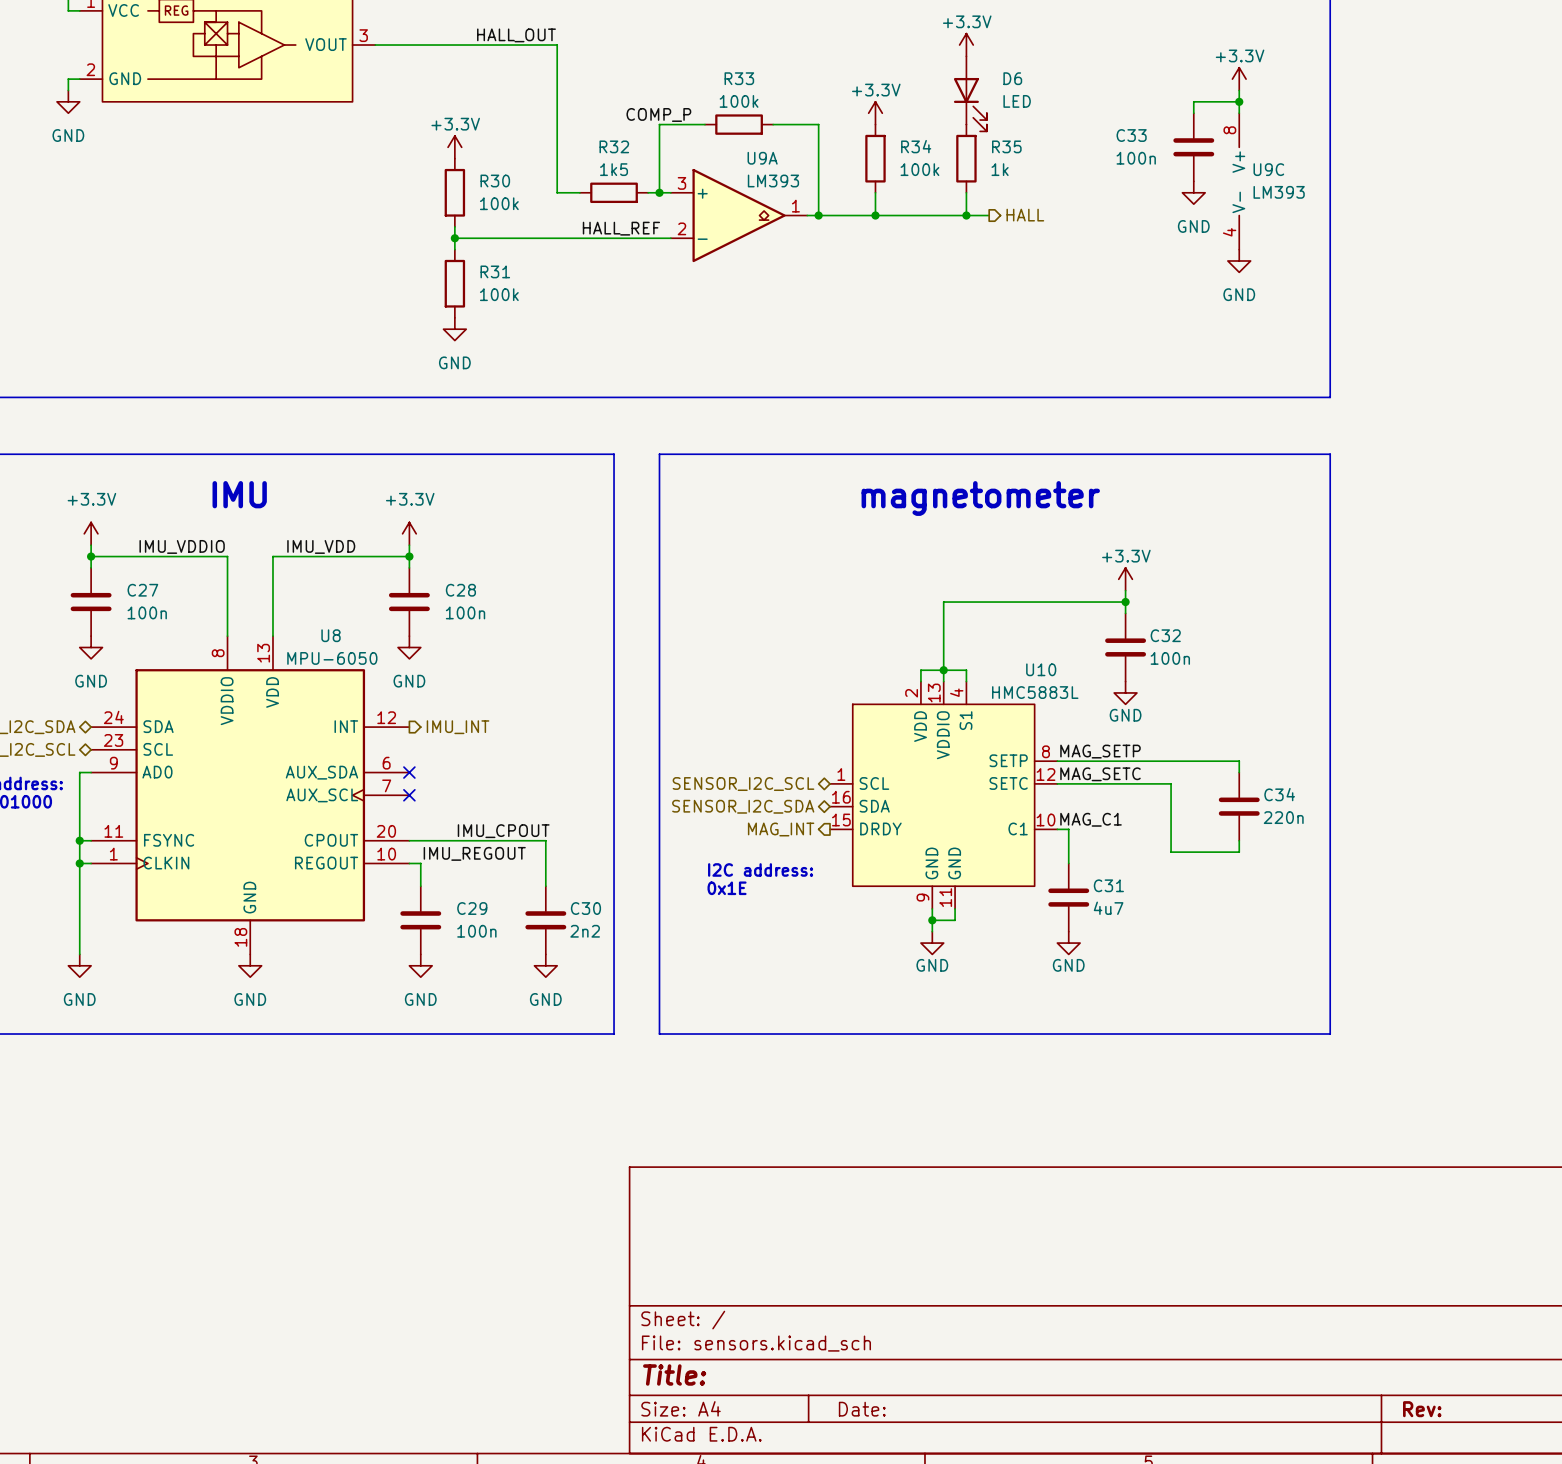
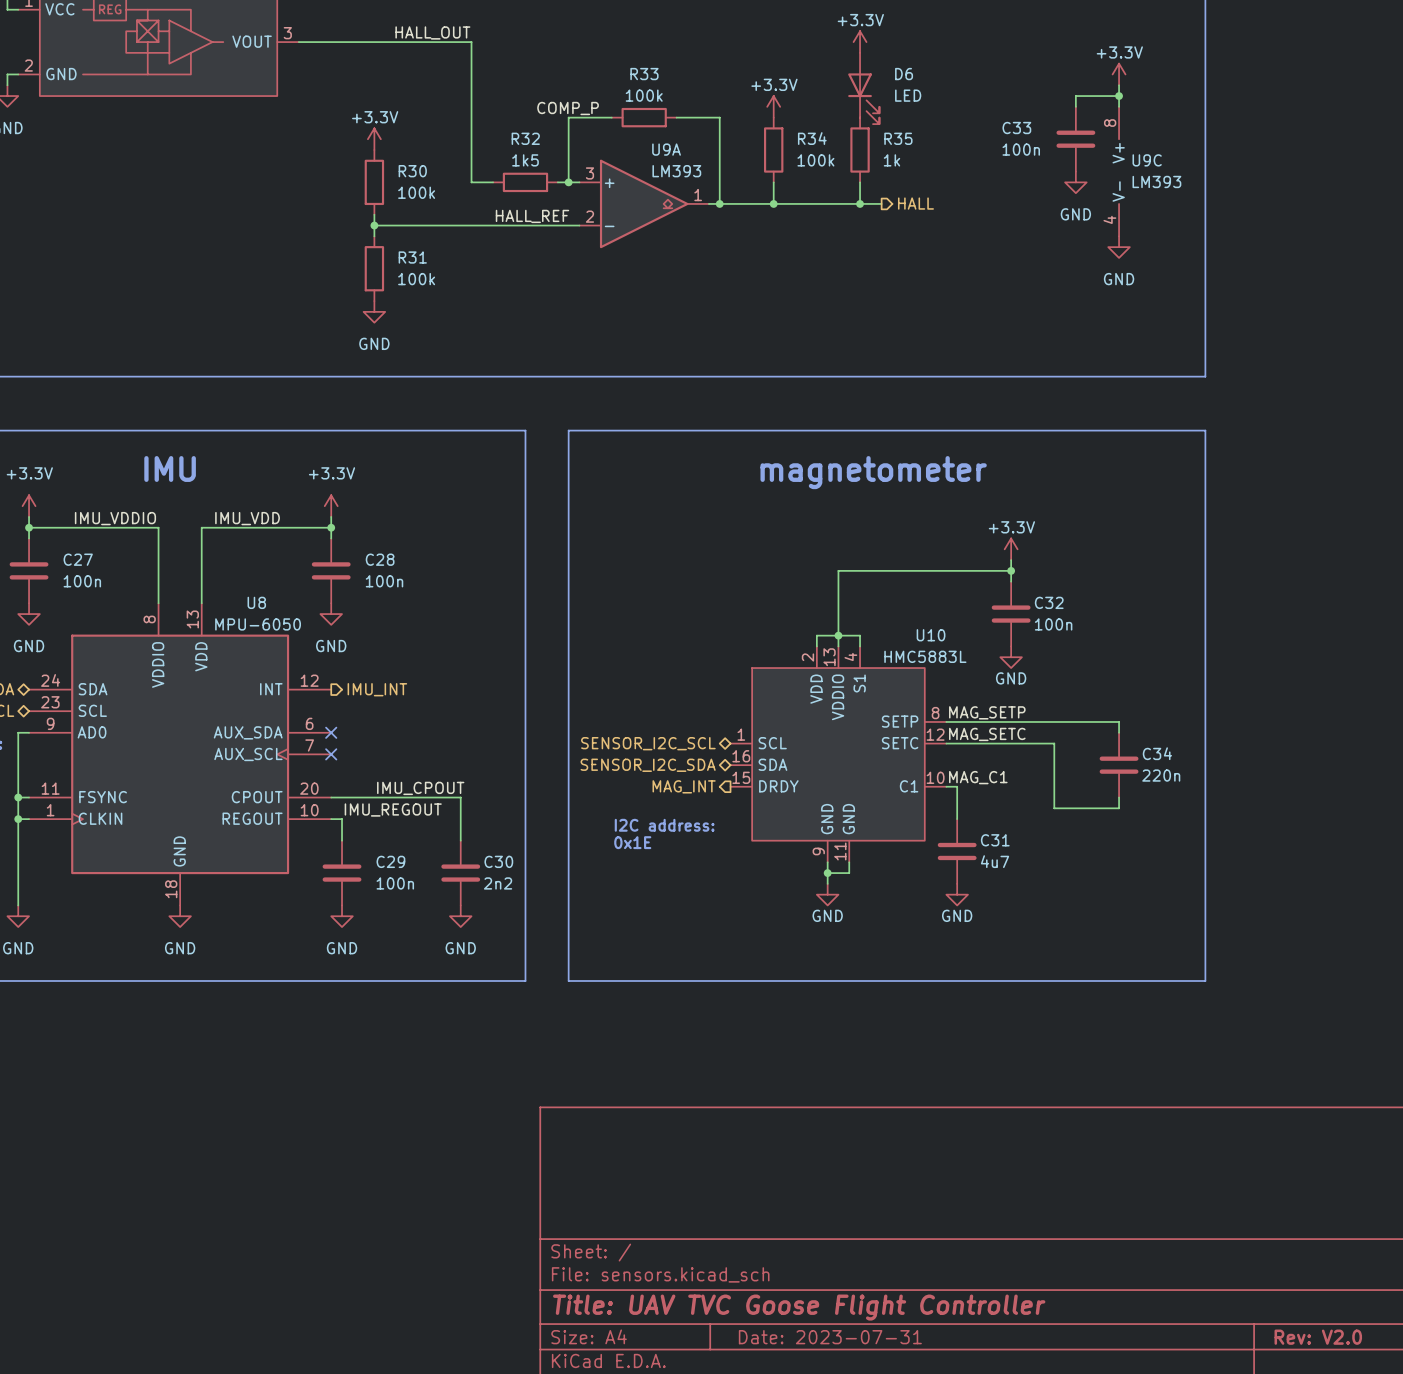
title block: Title: (674, 1374) -> Title: UAV TVC Goose Flight Controller (799, 1307)
title block: Date: (862, 1409) -> Date: 2023-07-31 (830, 1337)
title block: Rev: (1422, 1409) -> Rev: V2.0 (1318, 1337)

